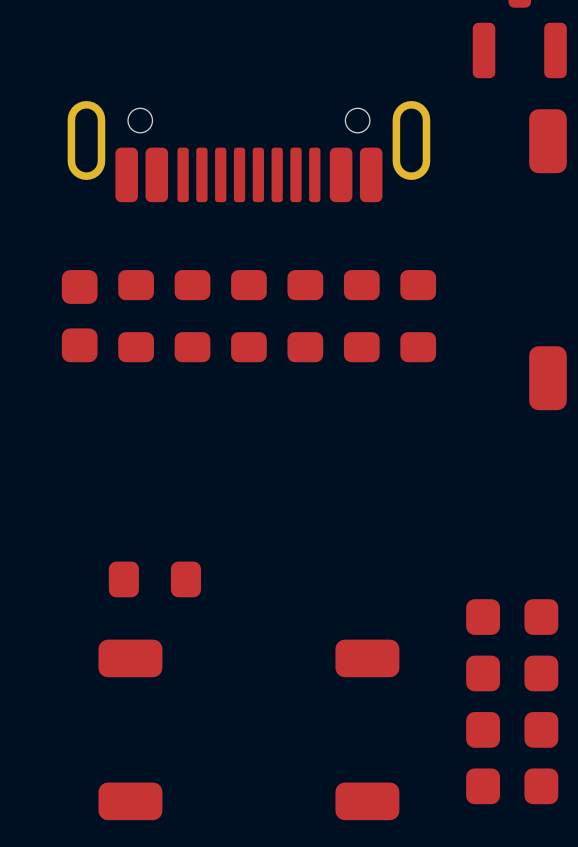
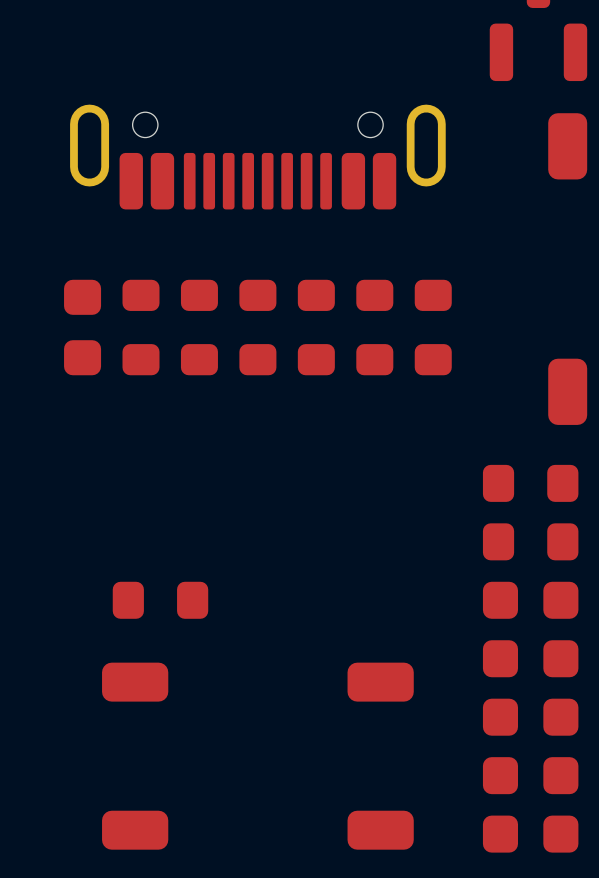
part: none -> (530, 483)
part: none -> (530, 541)
part: none -> (530, 600)
part: (512, 617) -> none
part: none -> (530, 658)
part: (512, 673) -> none
part: none -> (530, 717)
part: (512, 729) -> none
part: none -> (530, 775)
part: (512, 786) -> none
part: none -> (530, 834)

